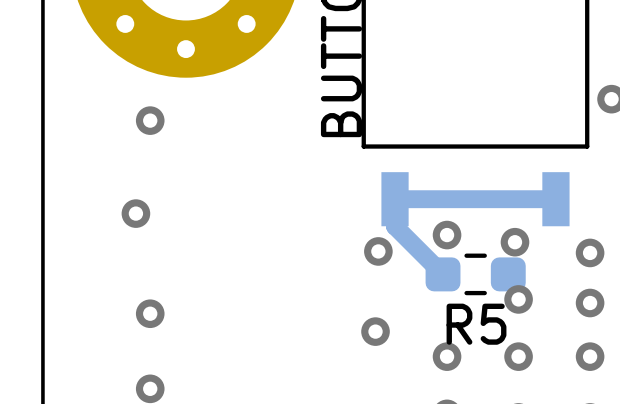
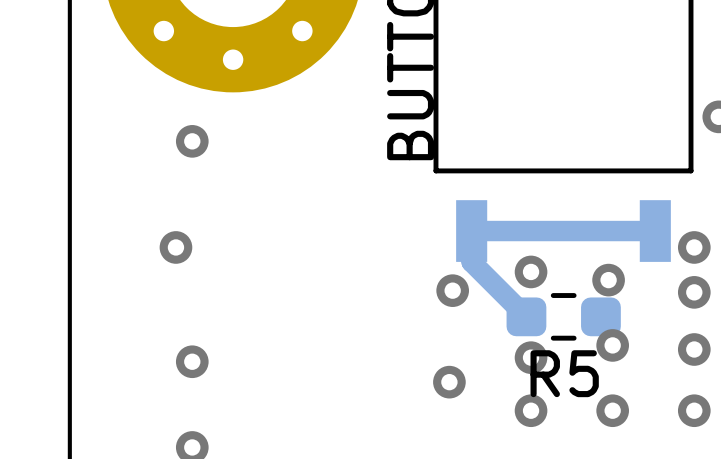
via: none -> (694, 247)
via: none -> (531, 357)

